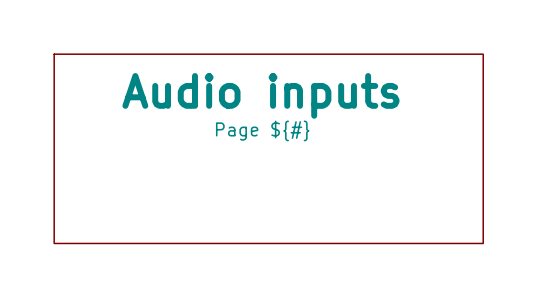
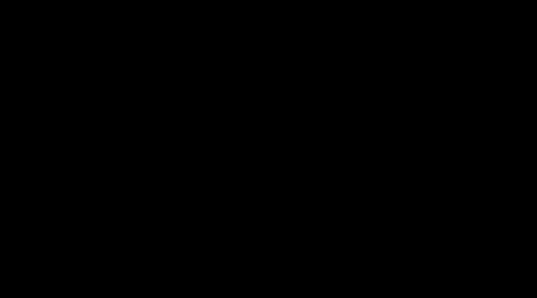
sheet Audio inputs: (268, 148) -> none

